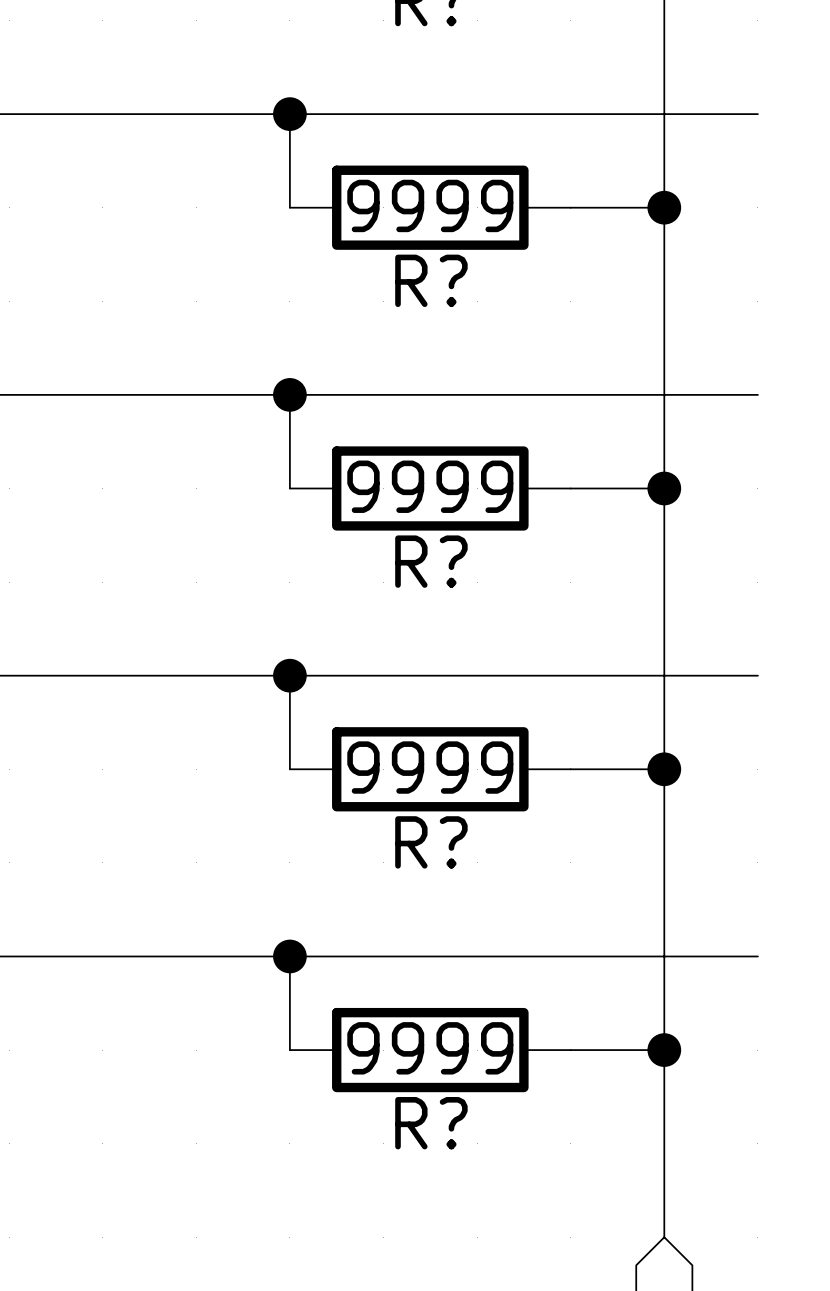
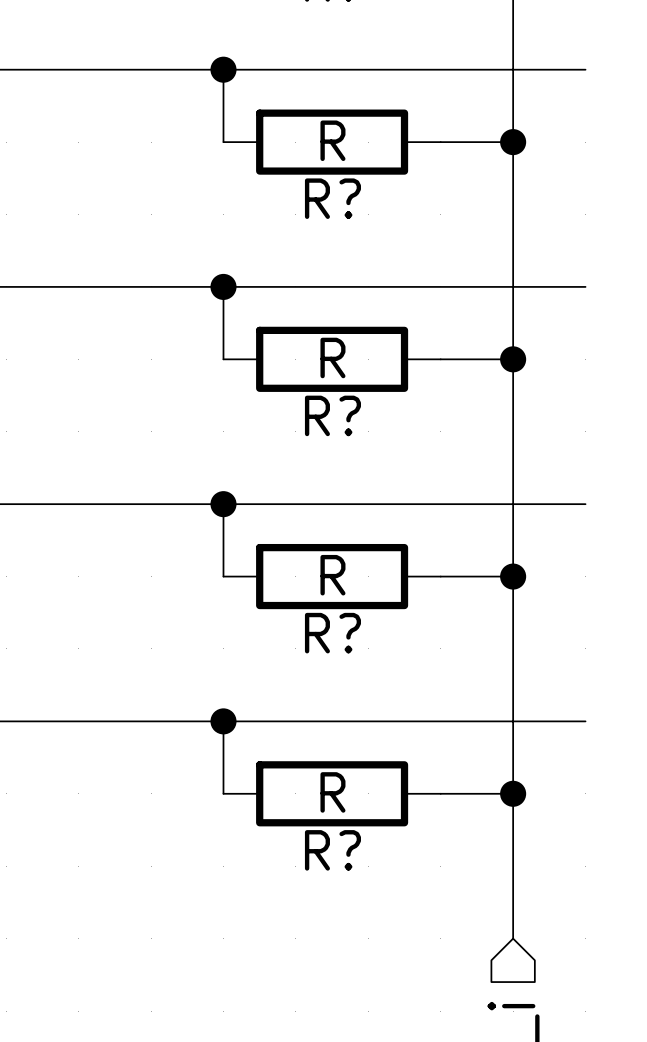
R? value: 9999 (430, 205) -> R (332, 140)
R? value: 9999 (430, 486) -> R (332, 357)
R? value: 9999 (430, 767) -> R (332, 575)
R? value: 9999 (430, 1048) -> R (332, 792)

